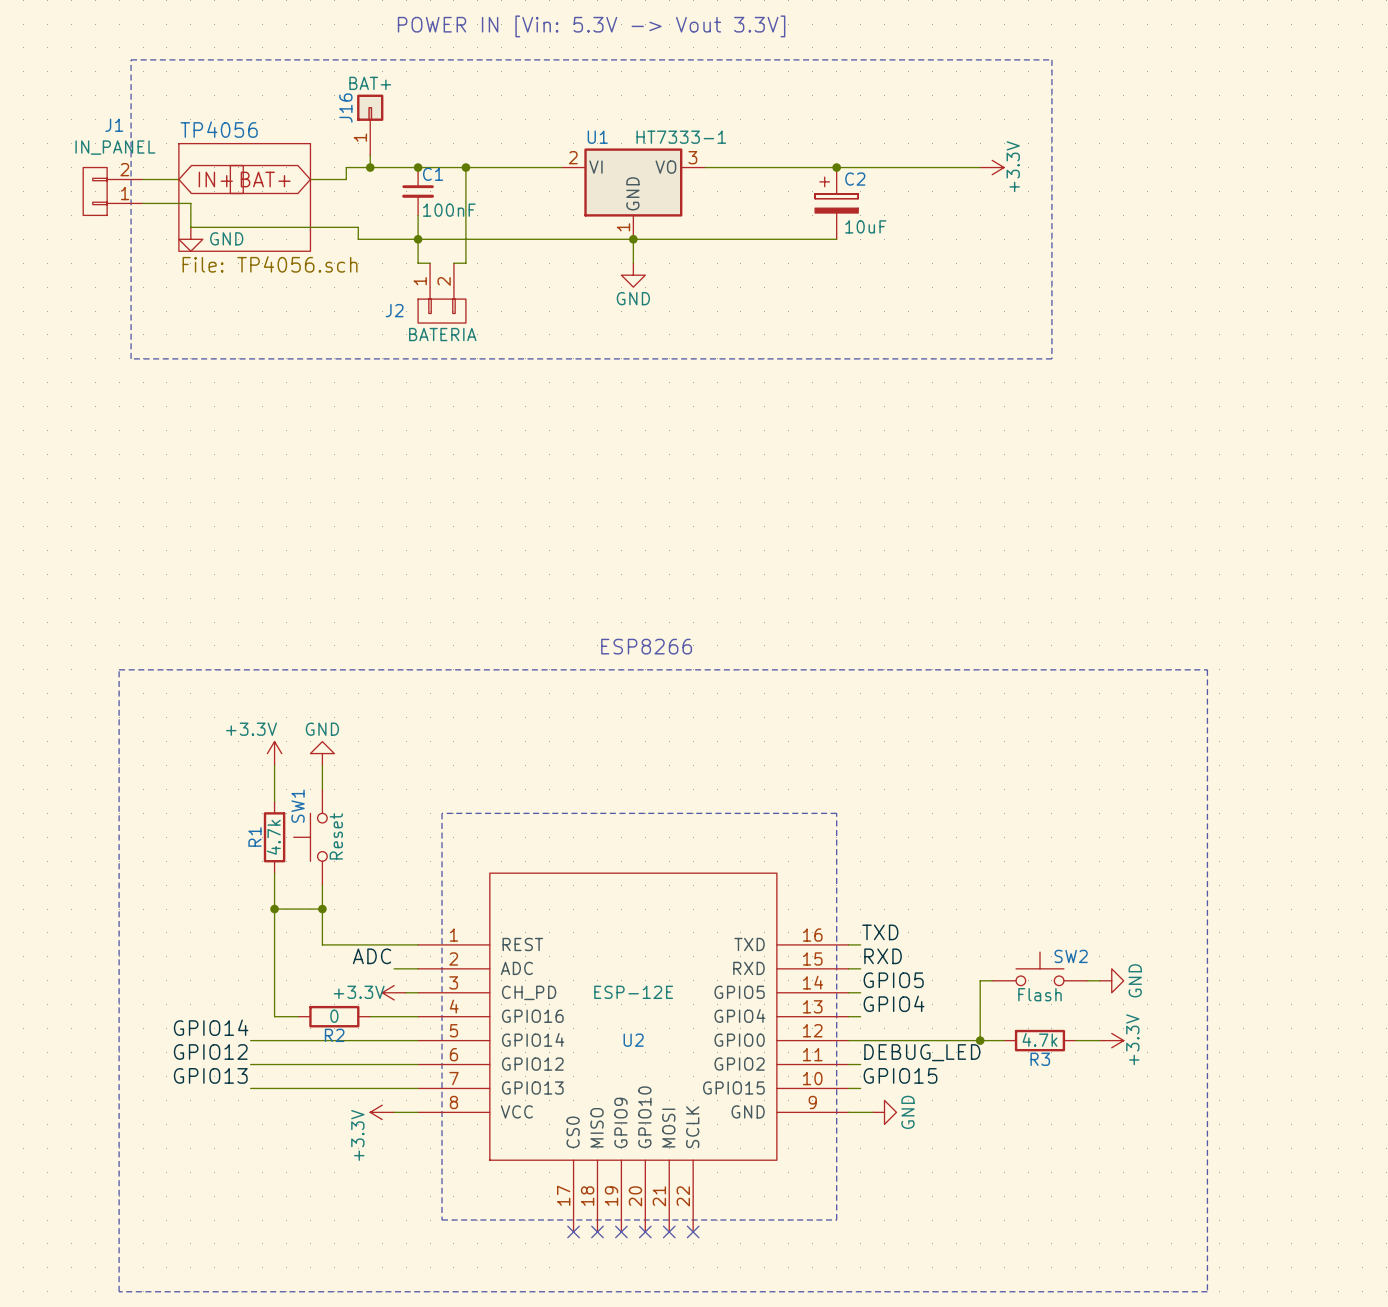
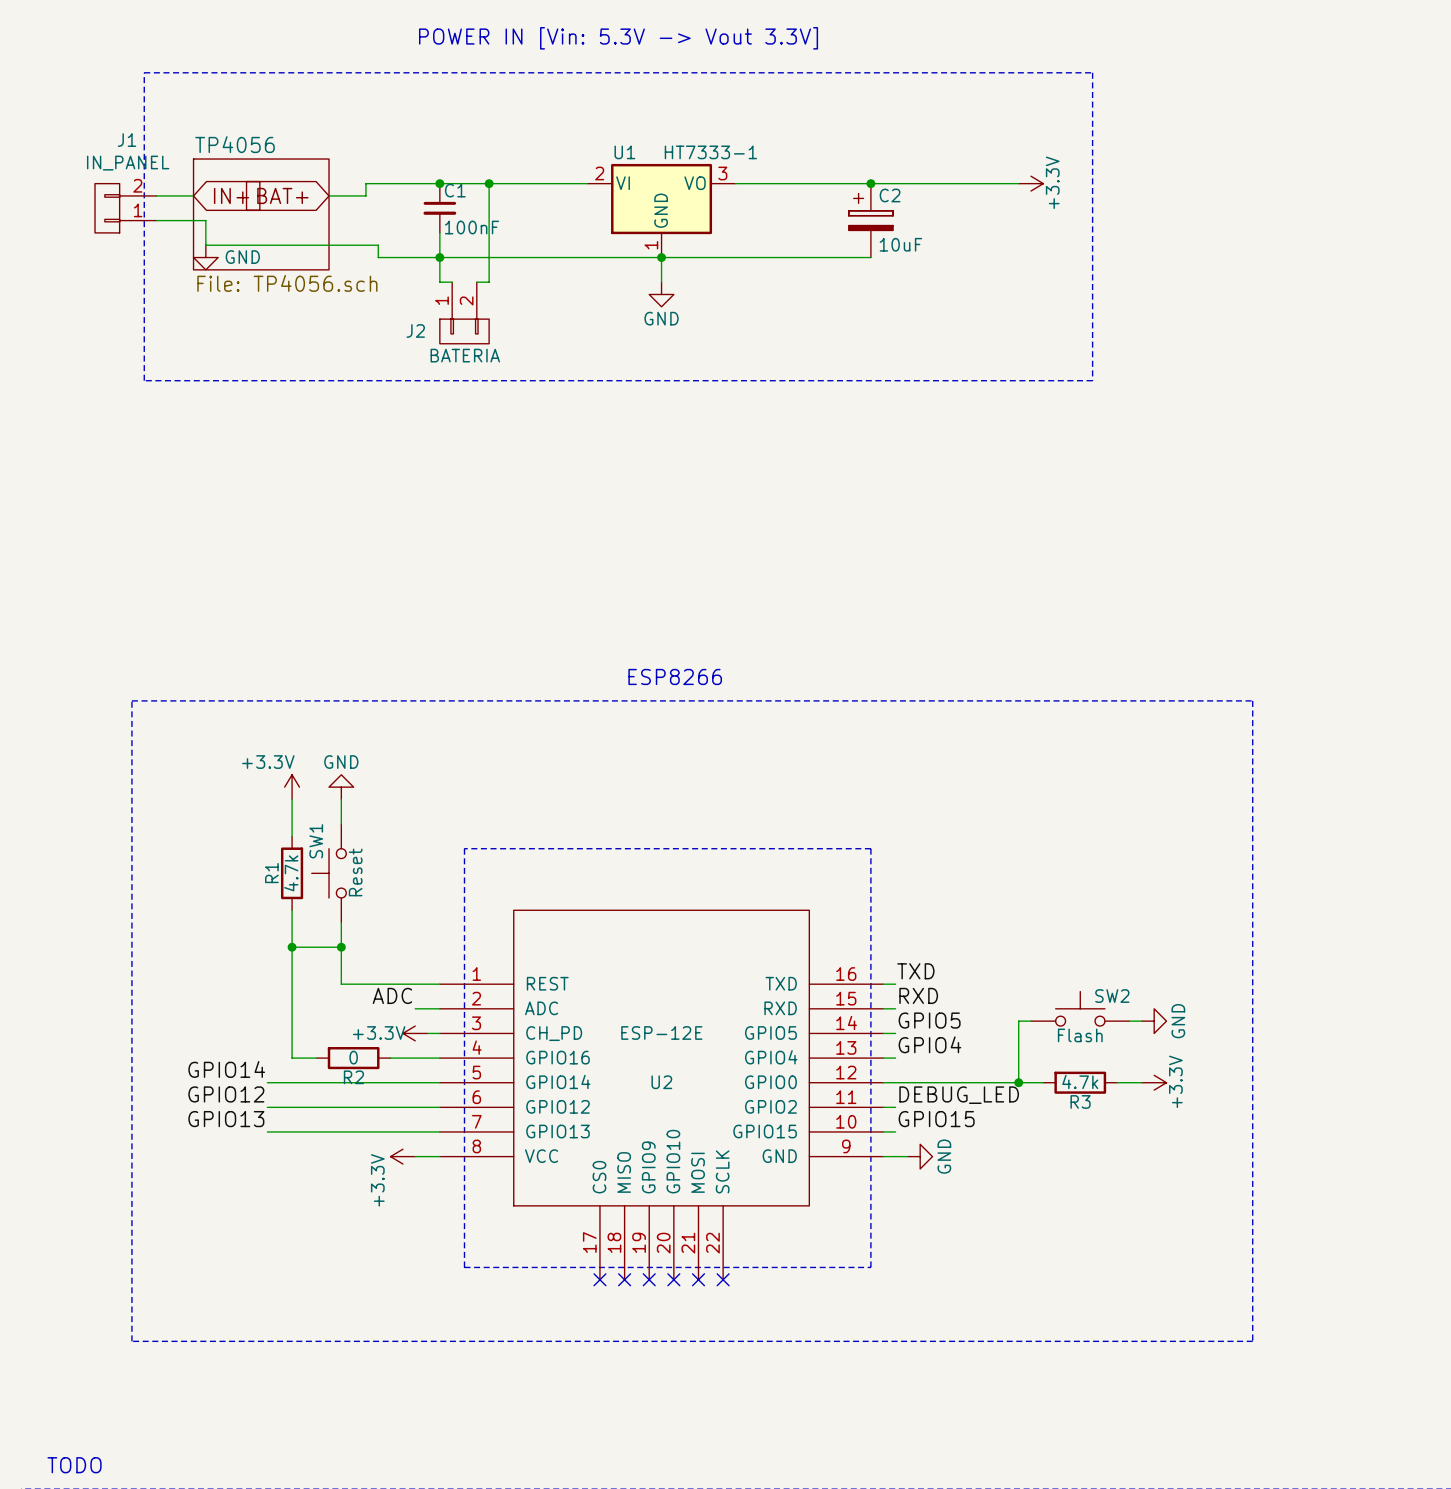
J16: BAT+ (370, 125) -> none
wire: (370, 155) (370, 167) -> none
junction: (370, 167) -> none

